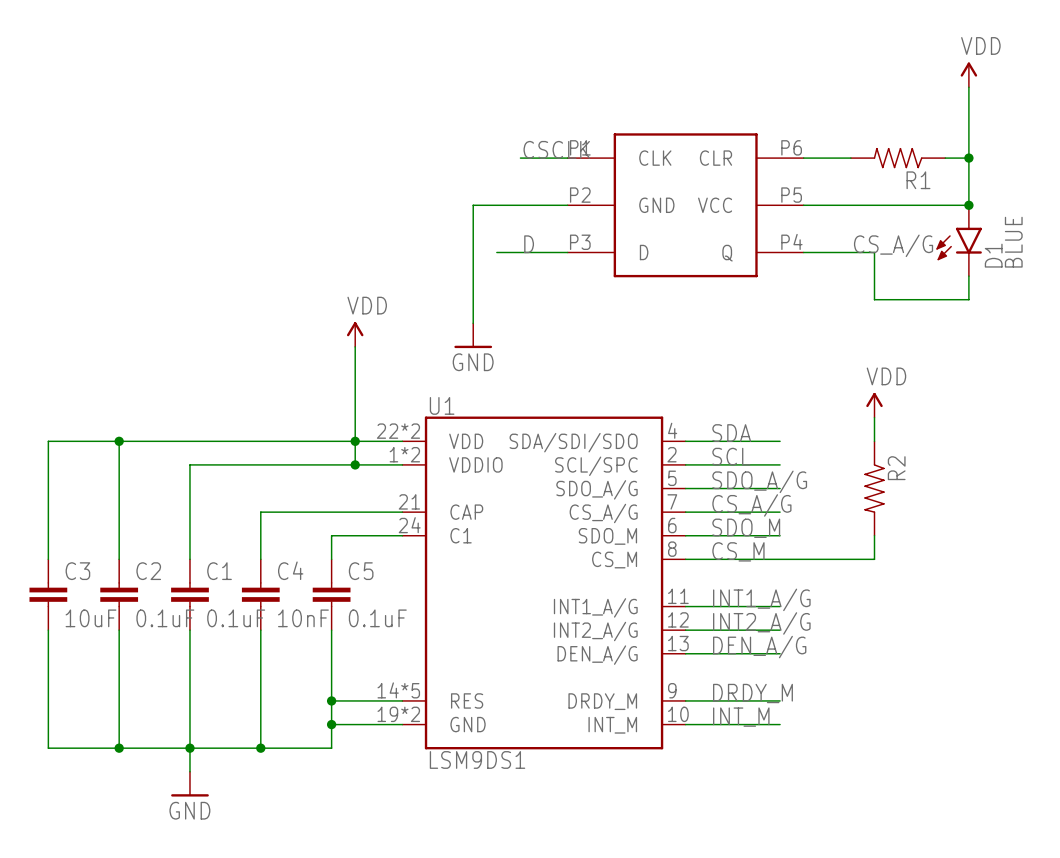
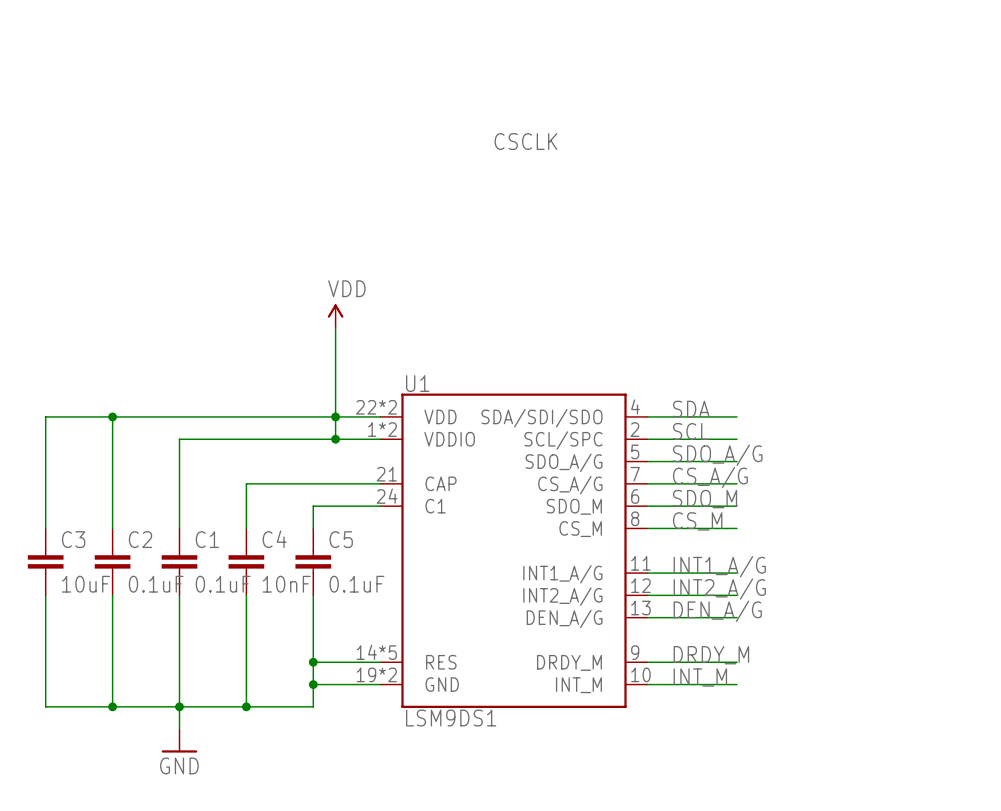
power symbol: VDD (968, 74) -> none
wire: (968, 87) (968, 205) (803, 205) -> none
wire: (520, 158) (567, 158) -> none
wire: (803, 158) (850, 158) -> none
R1: (898, 158) -> none
wire: (945, 158) (968, 158) -> none
junction: (968, 158) -> none
wire: (567, 205) (473, 205) (473, 323) -> none
part: (685, 205) -> none
junction: (968, 205) -> none
D1: BLUE (959, 240) -> none
label: D (529, 244) -> none
label: CS_A/G (893, 245) -> none
wire: (496, 252) (567, 252) -> none
wire: (803, 252) (874, 252) (874, 299) (968, 299) (968, 276) -> none
power symbol: GND (473, 335) -> none
power symbol: VDD (874, 405) -> none
wire: (874, 417) (874, 441) -> none
R2: (874, 488) -> none
wire: (874, 535) (874, 559) (780, 559) -> none

